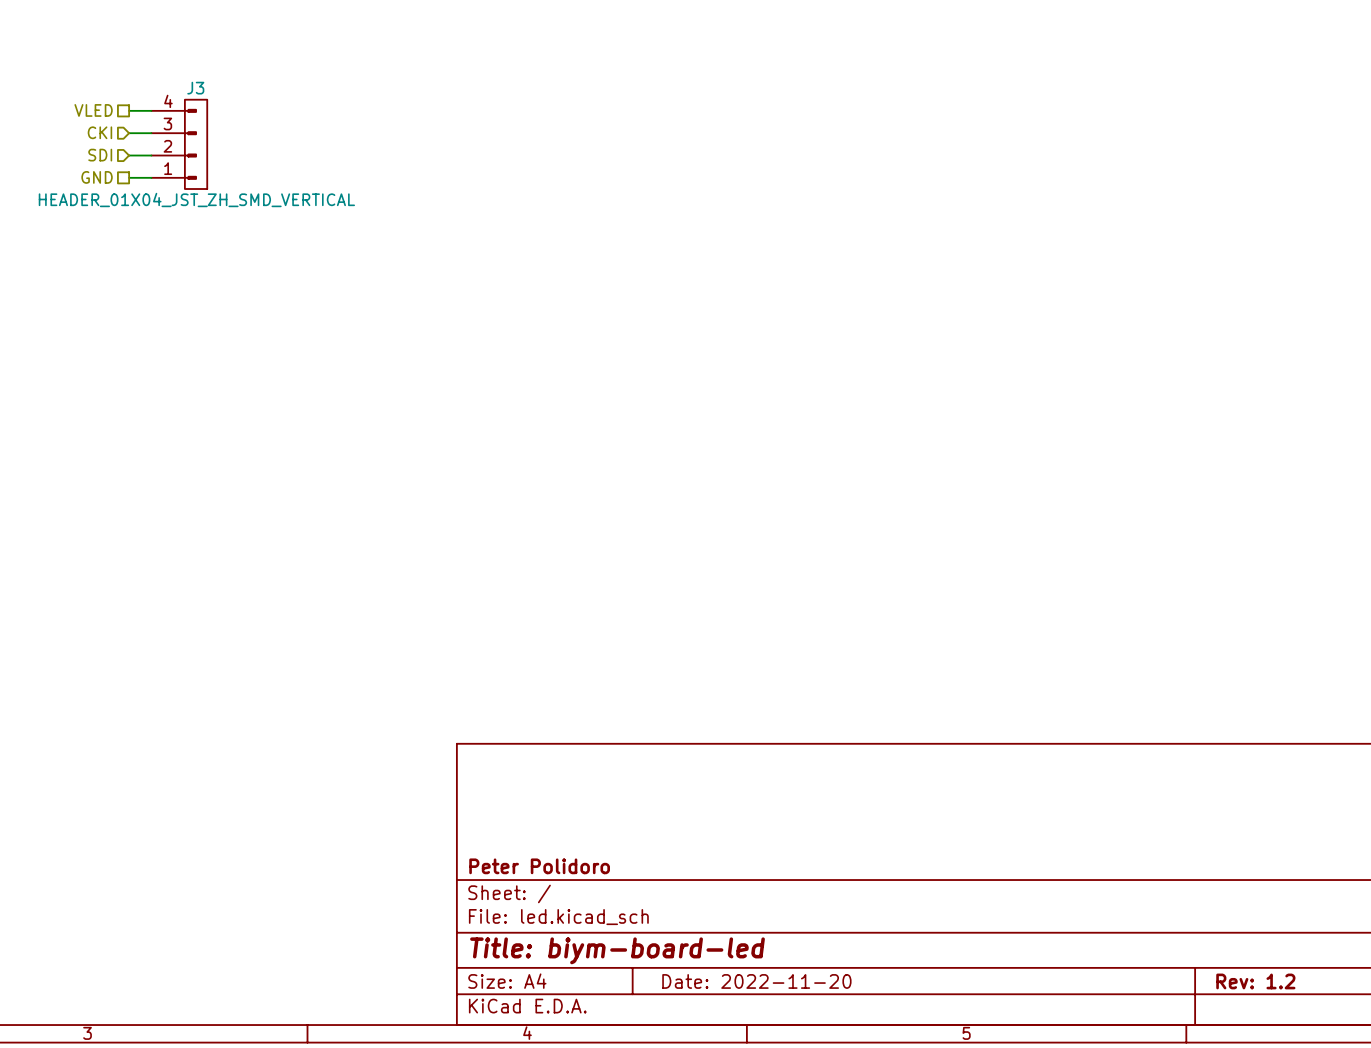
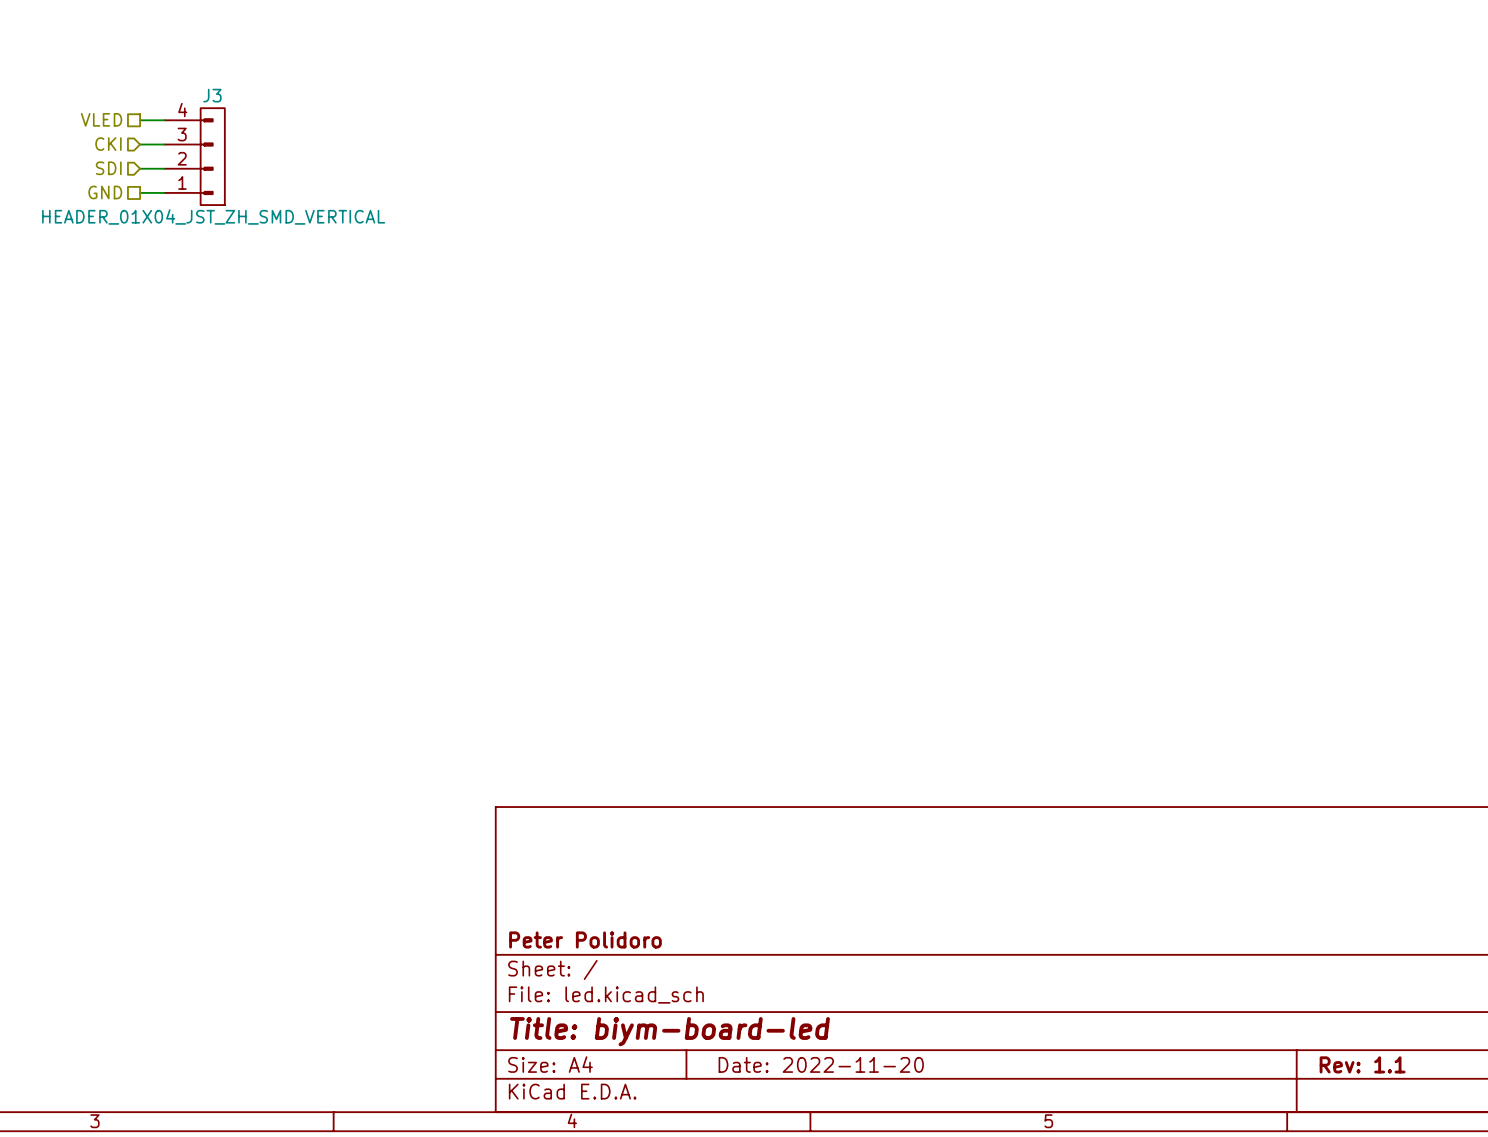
title block: Rev: 1.2 (1255, 981) -> Rev: 1.1 (1362, 1064)

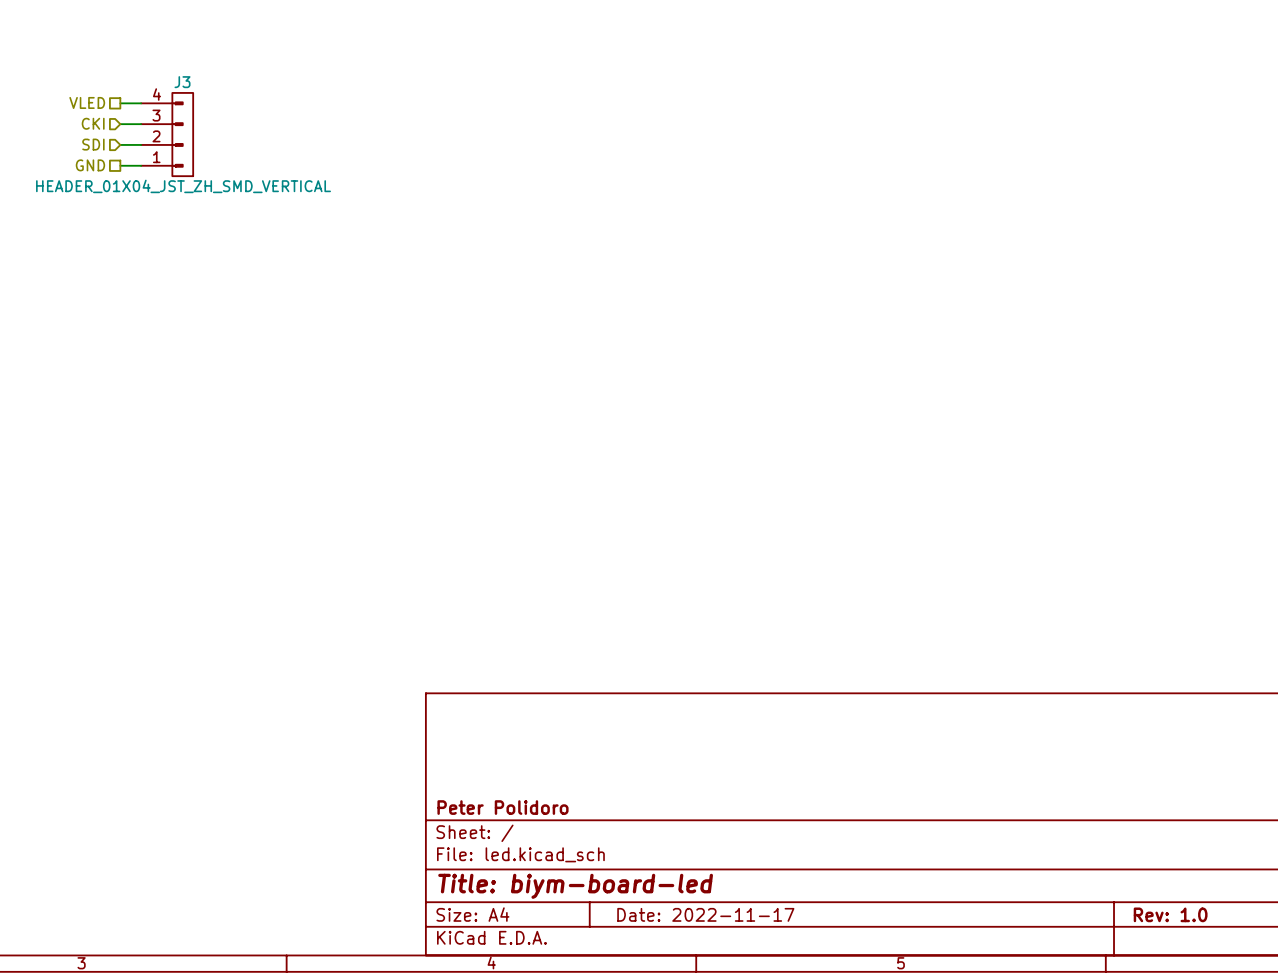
title block: Date: 2022-11-20 (821, 1064) -> Date: 2022-11-17 (705, 914)
title block: Rev: 1.1 (1362, 1064) -> Rev: 1.0 (1170, 914)

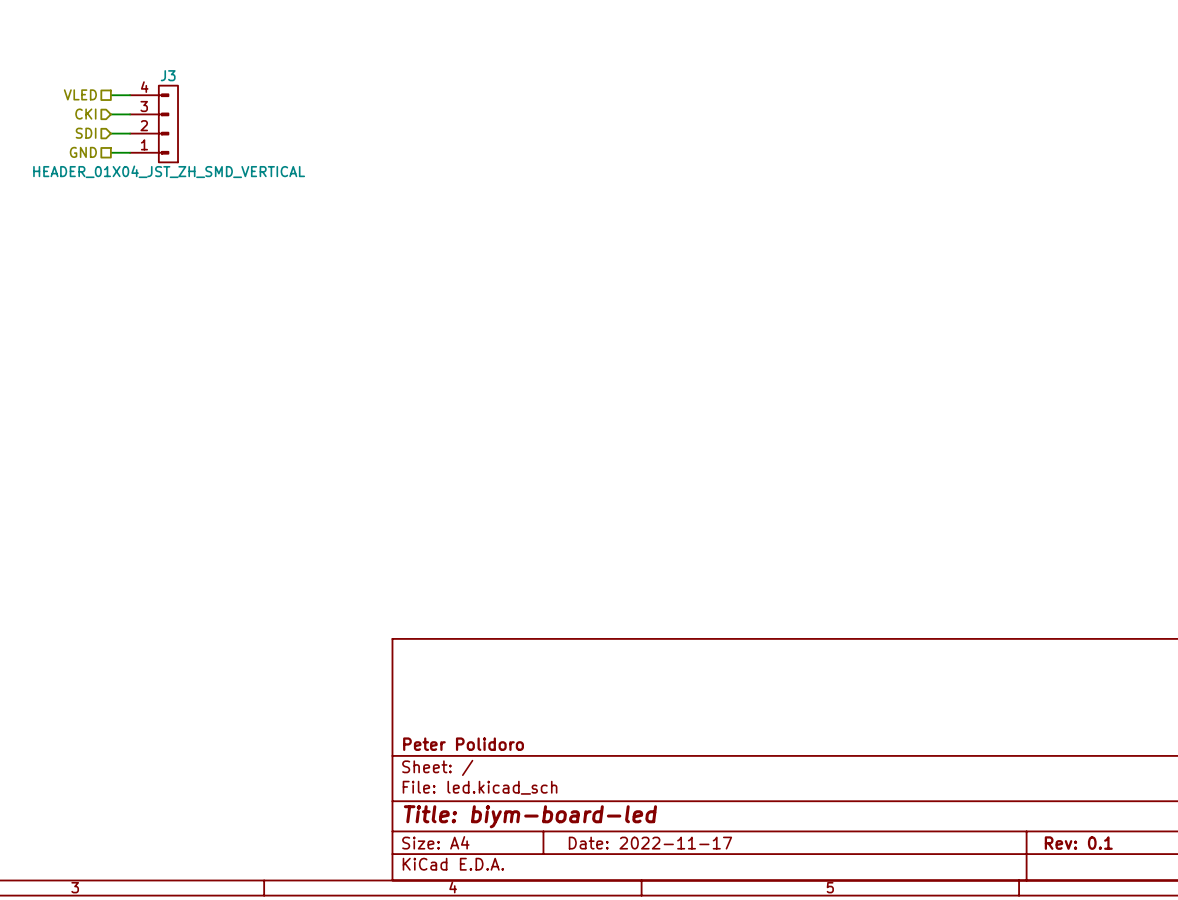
title block: Rev: 1.0 (1170, 914) -> Rev: 0.1 (1078, 843)

